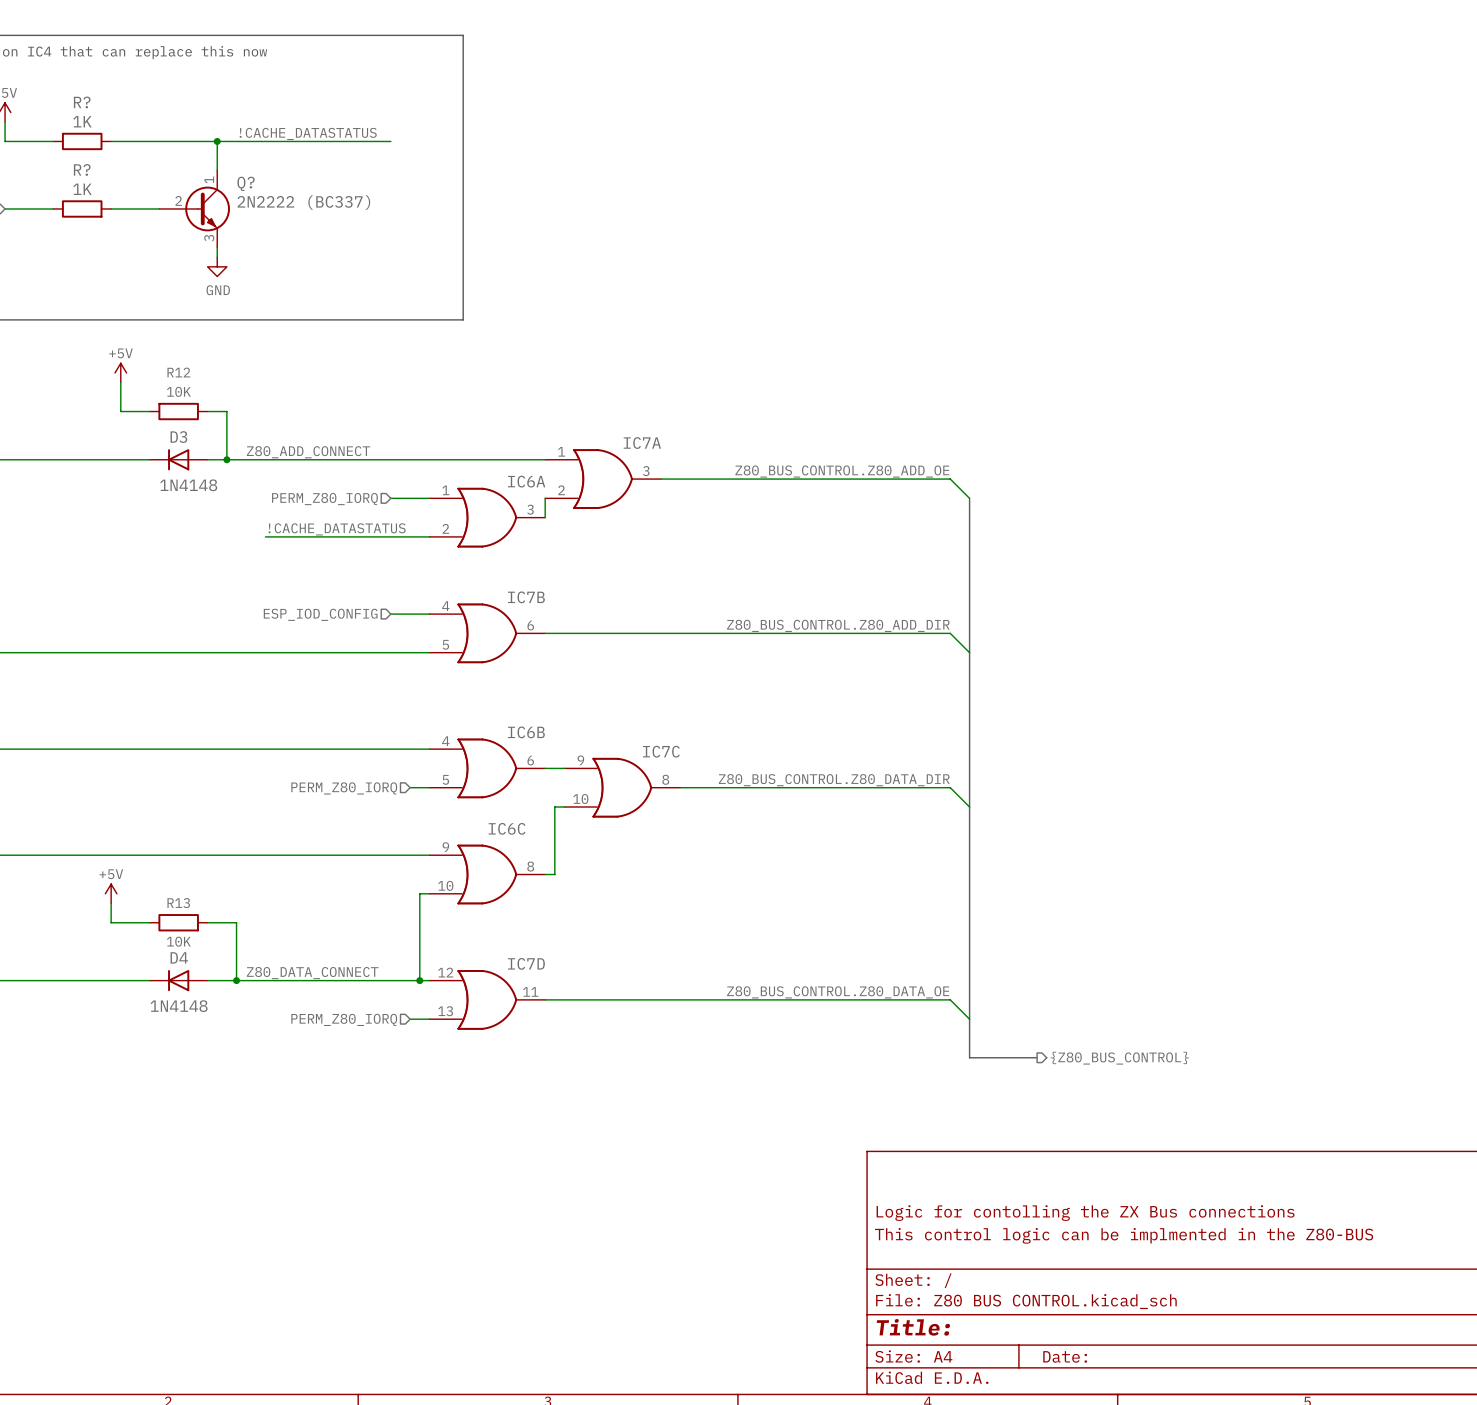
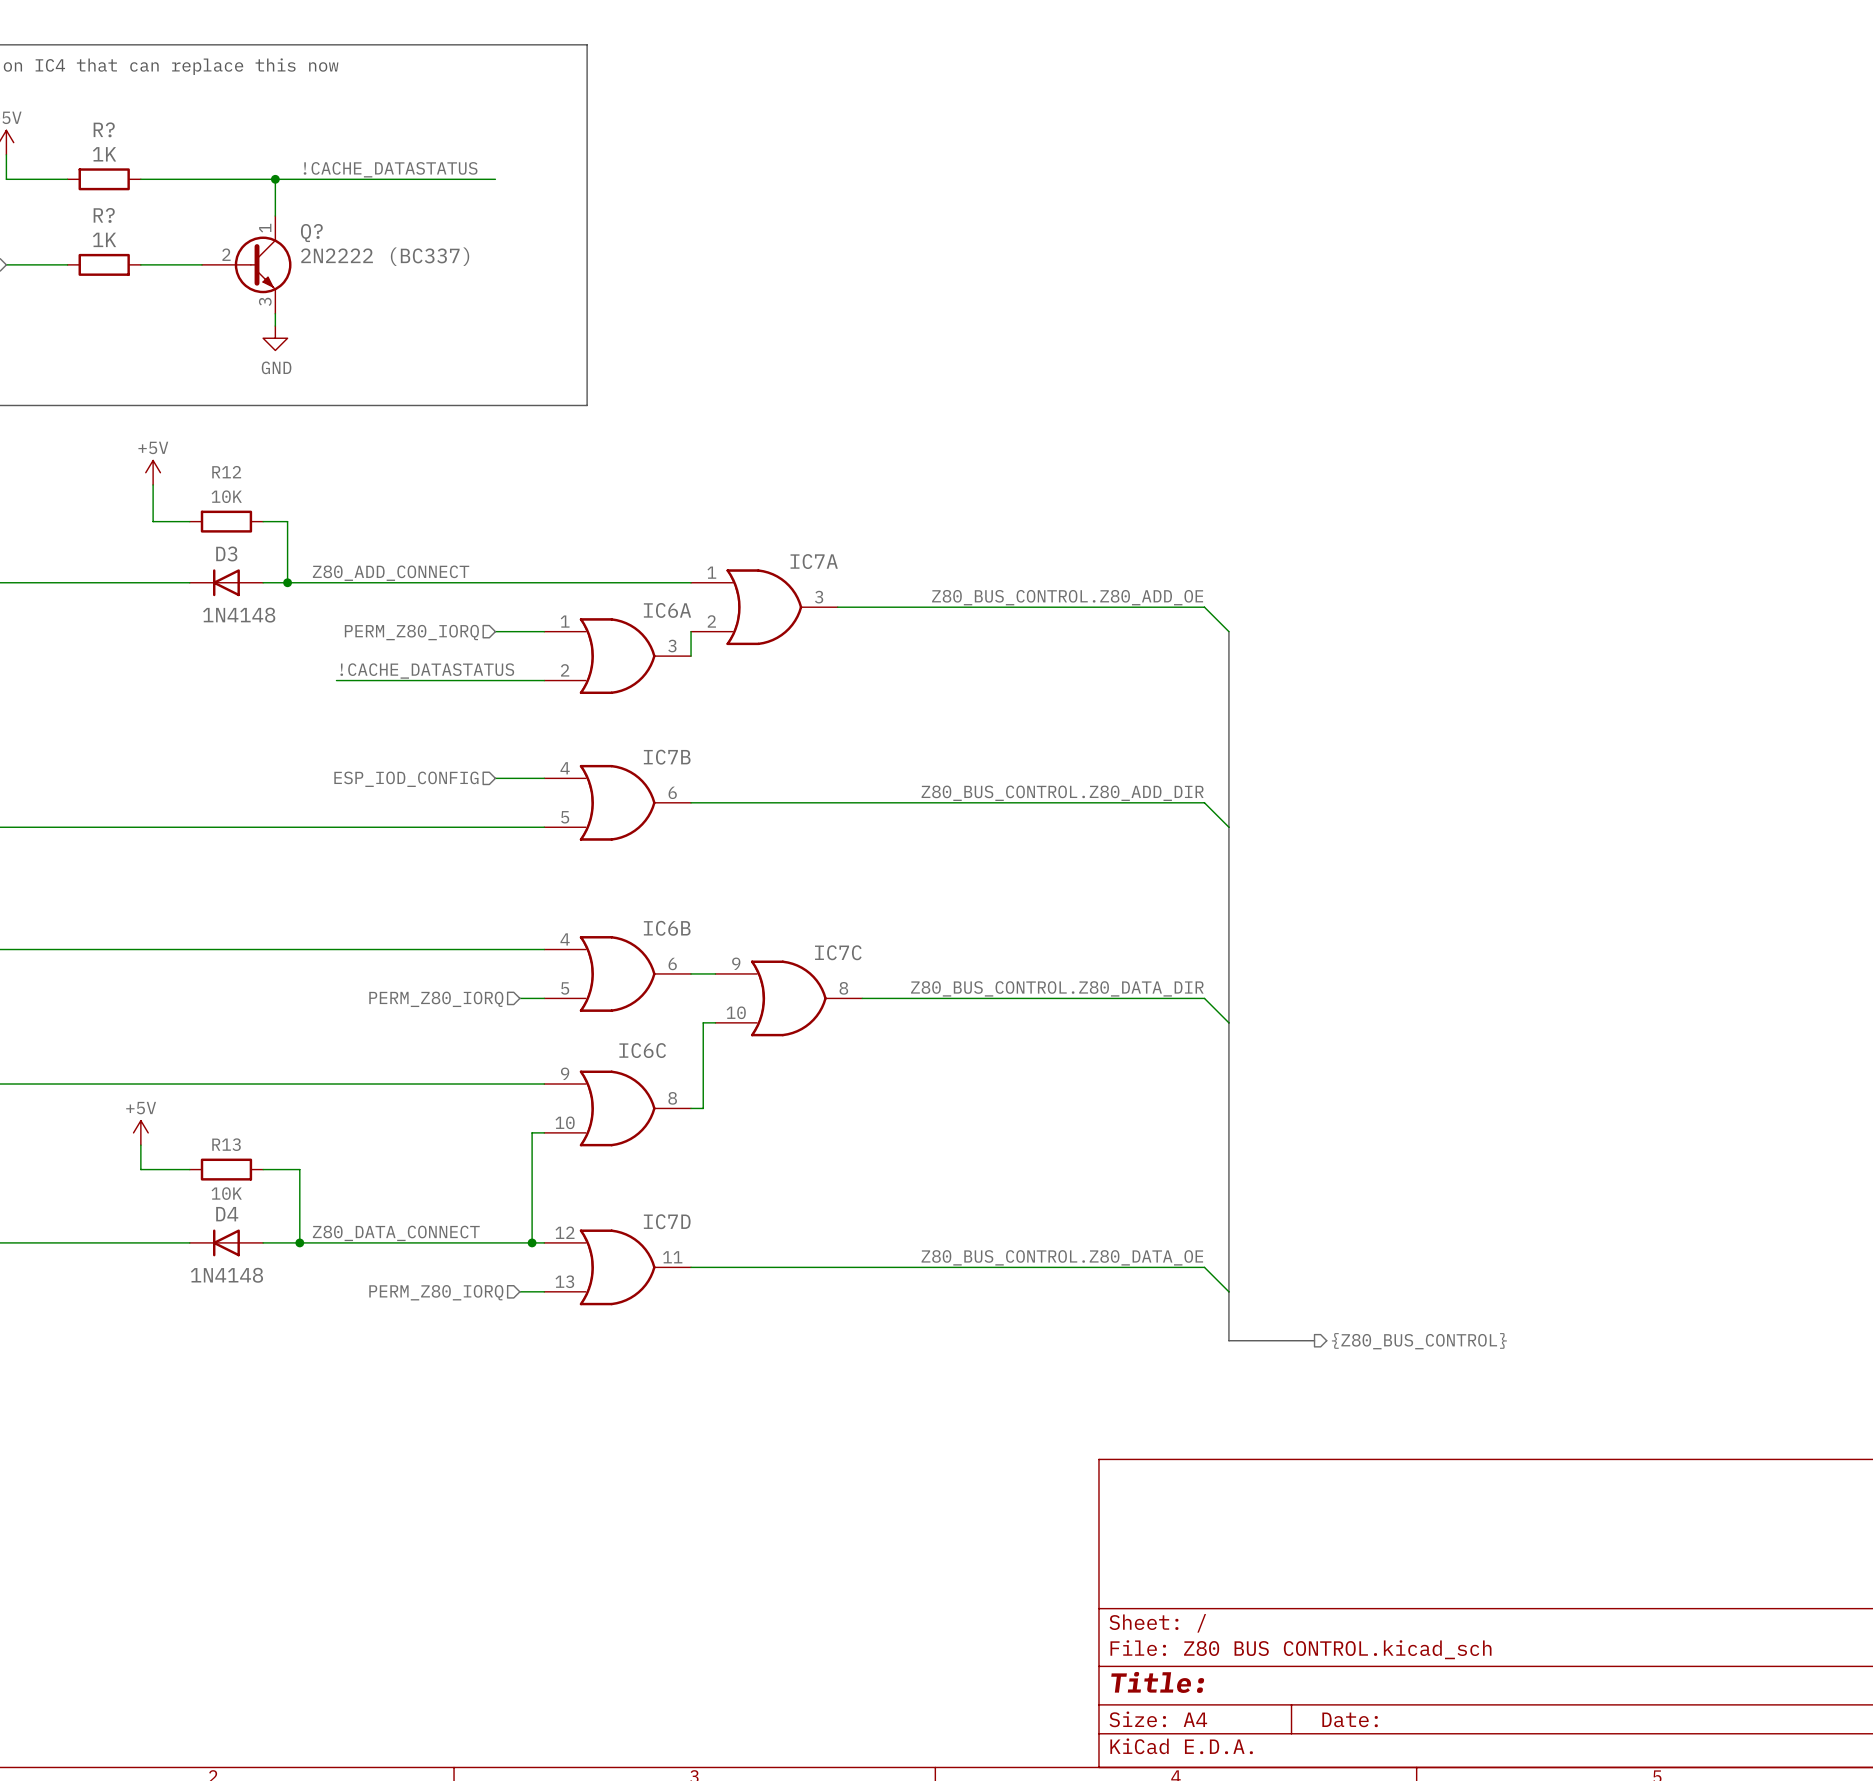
title block: Logic for contolling the ZX Bus connections (1085, 1213) -> none
title block: This control logic can be implmented in the Z80-BUS (1124, 1235) -> none

